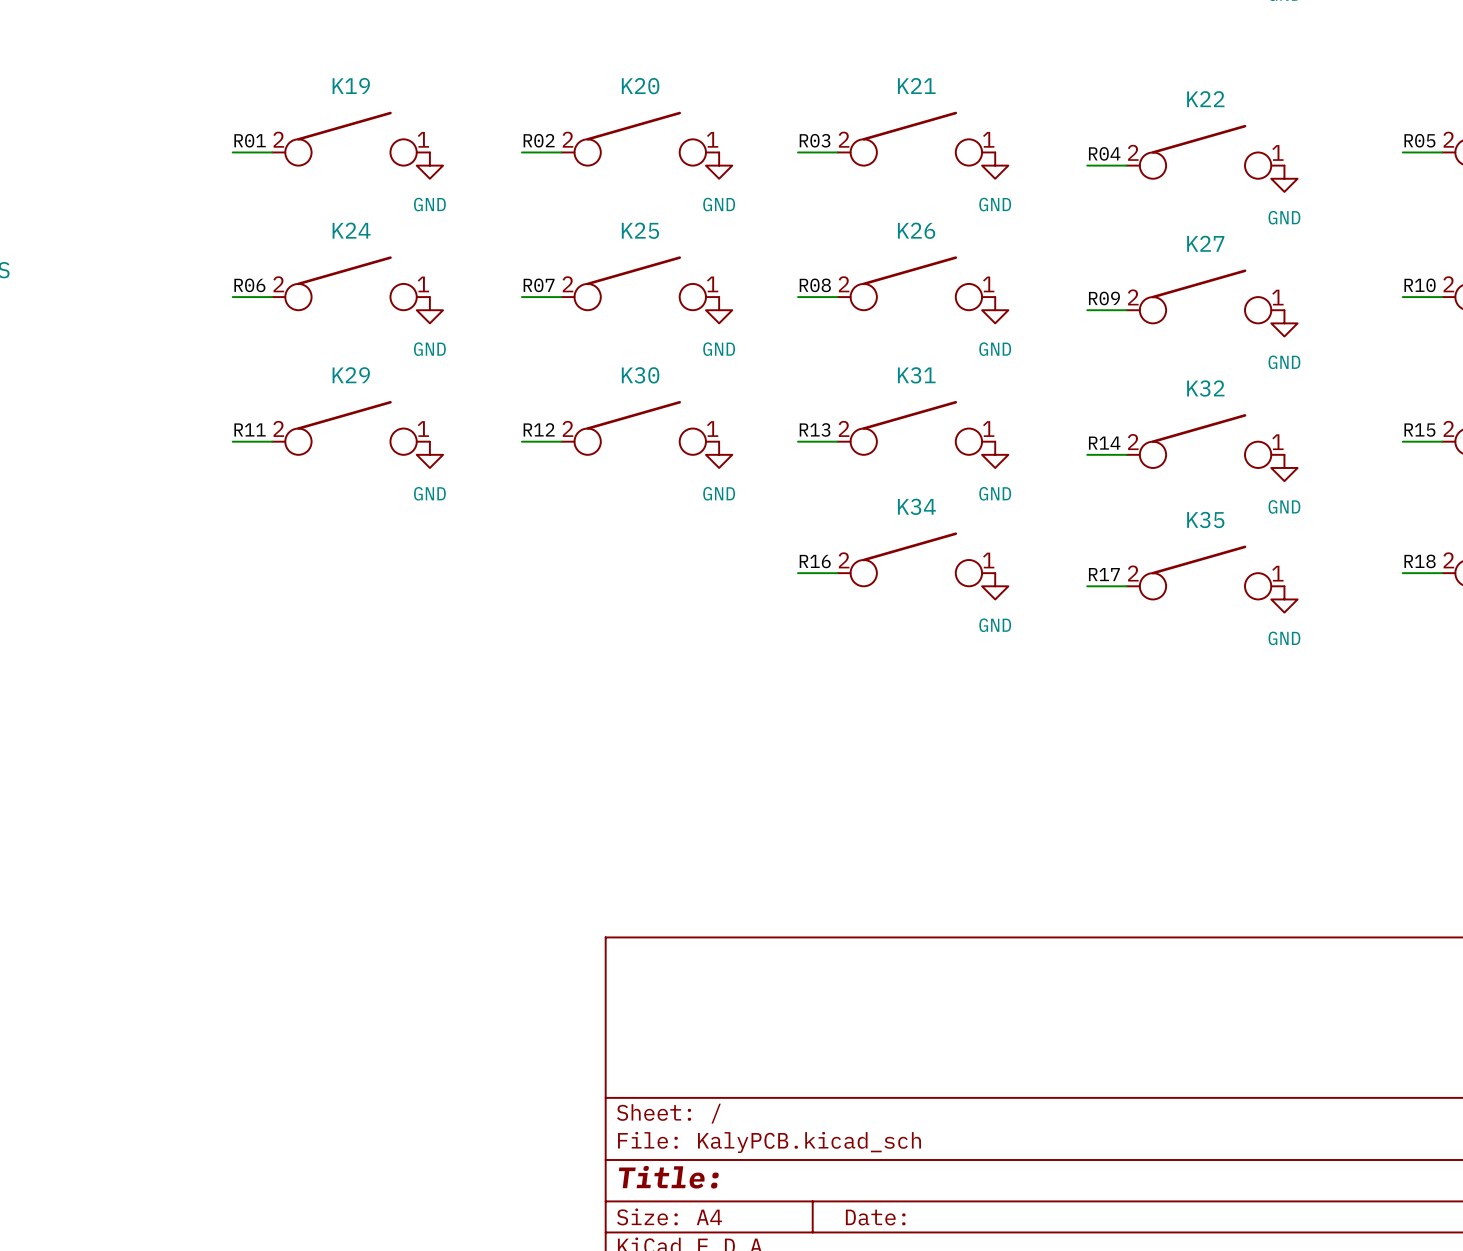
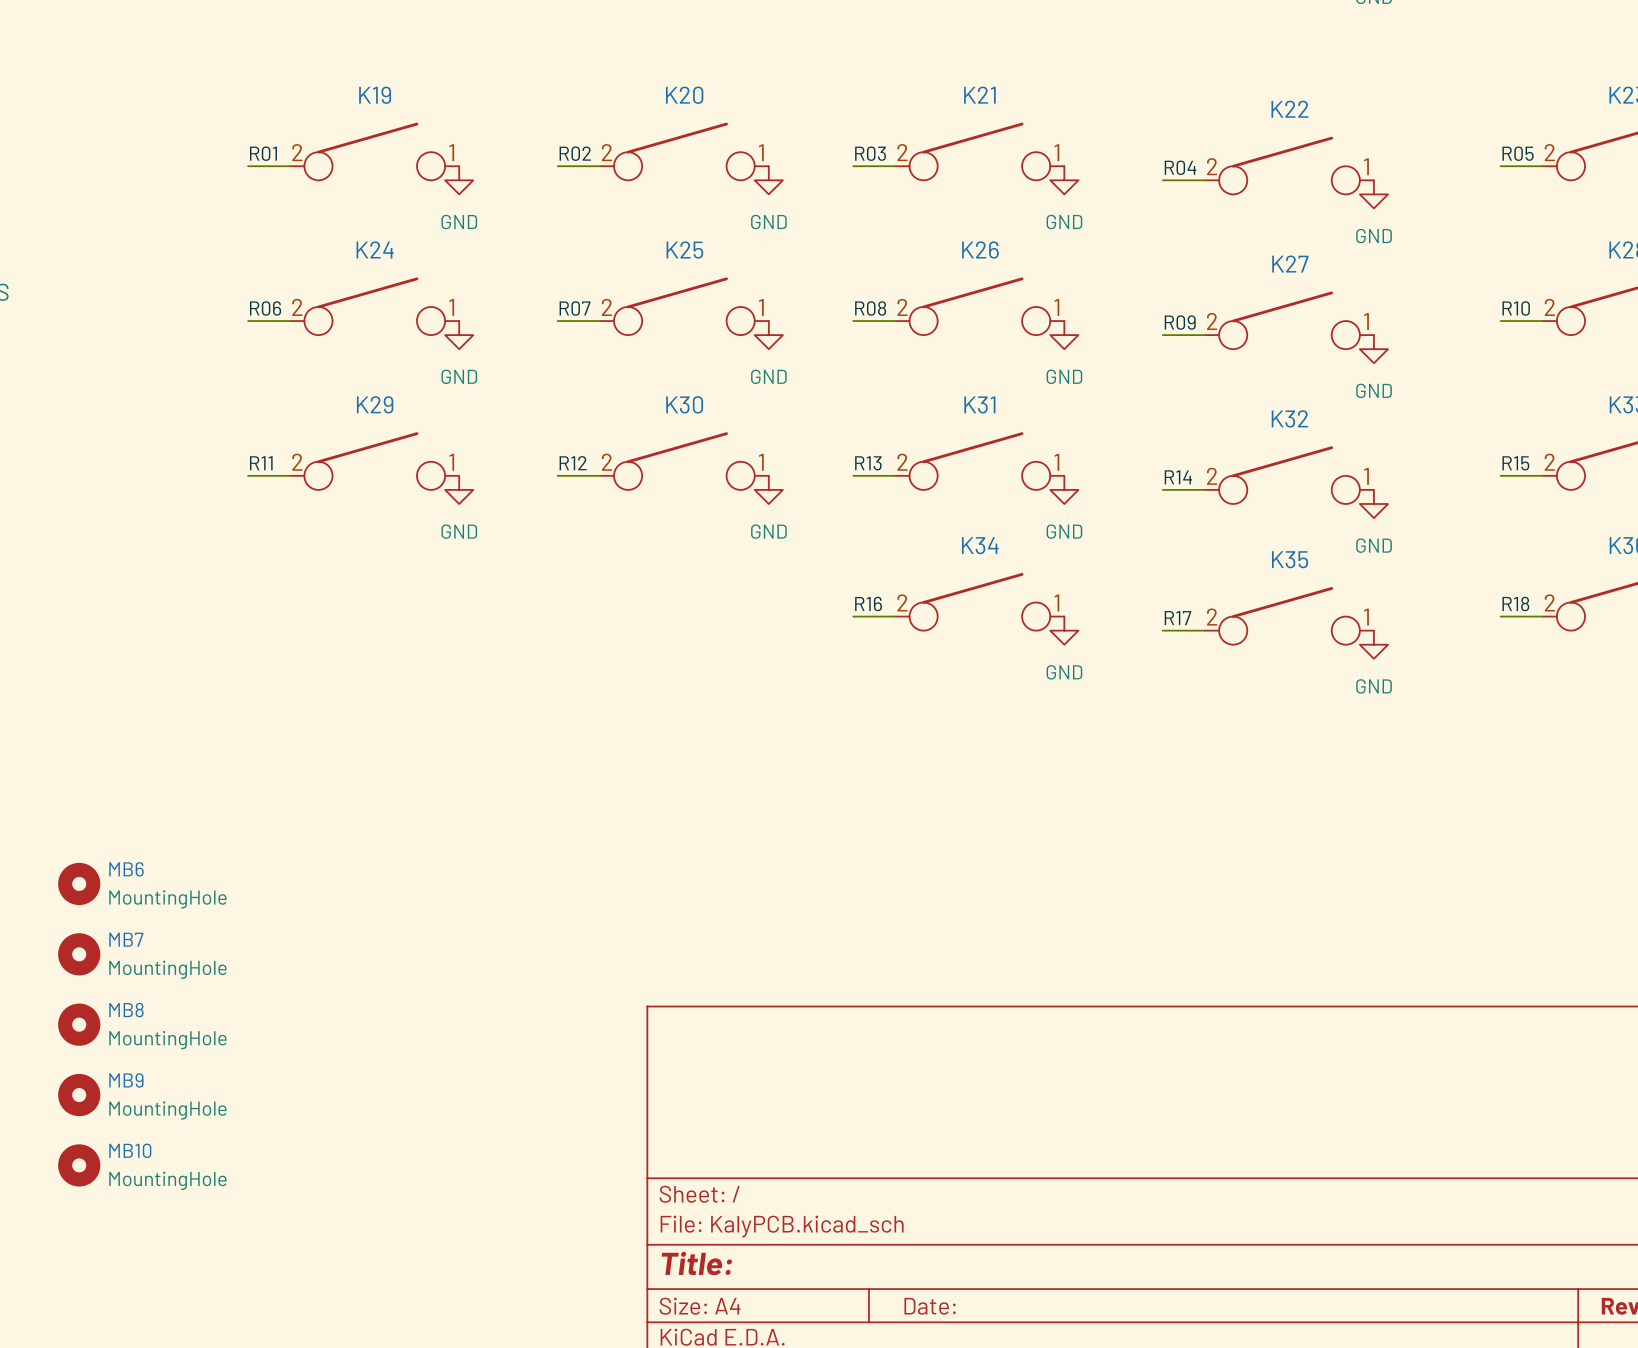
MB6: none -> MountingHole (79, 883)
MB7: none -> MountingHole (79, 954)
MB8: none -> MountingHole (79, 1024)
MB9: none -> MountingHole (79, 1095)
MB10: none -> MountingHole (79, 1165)

